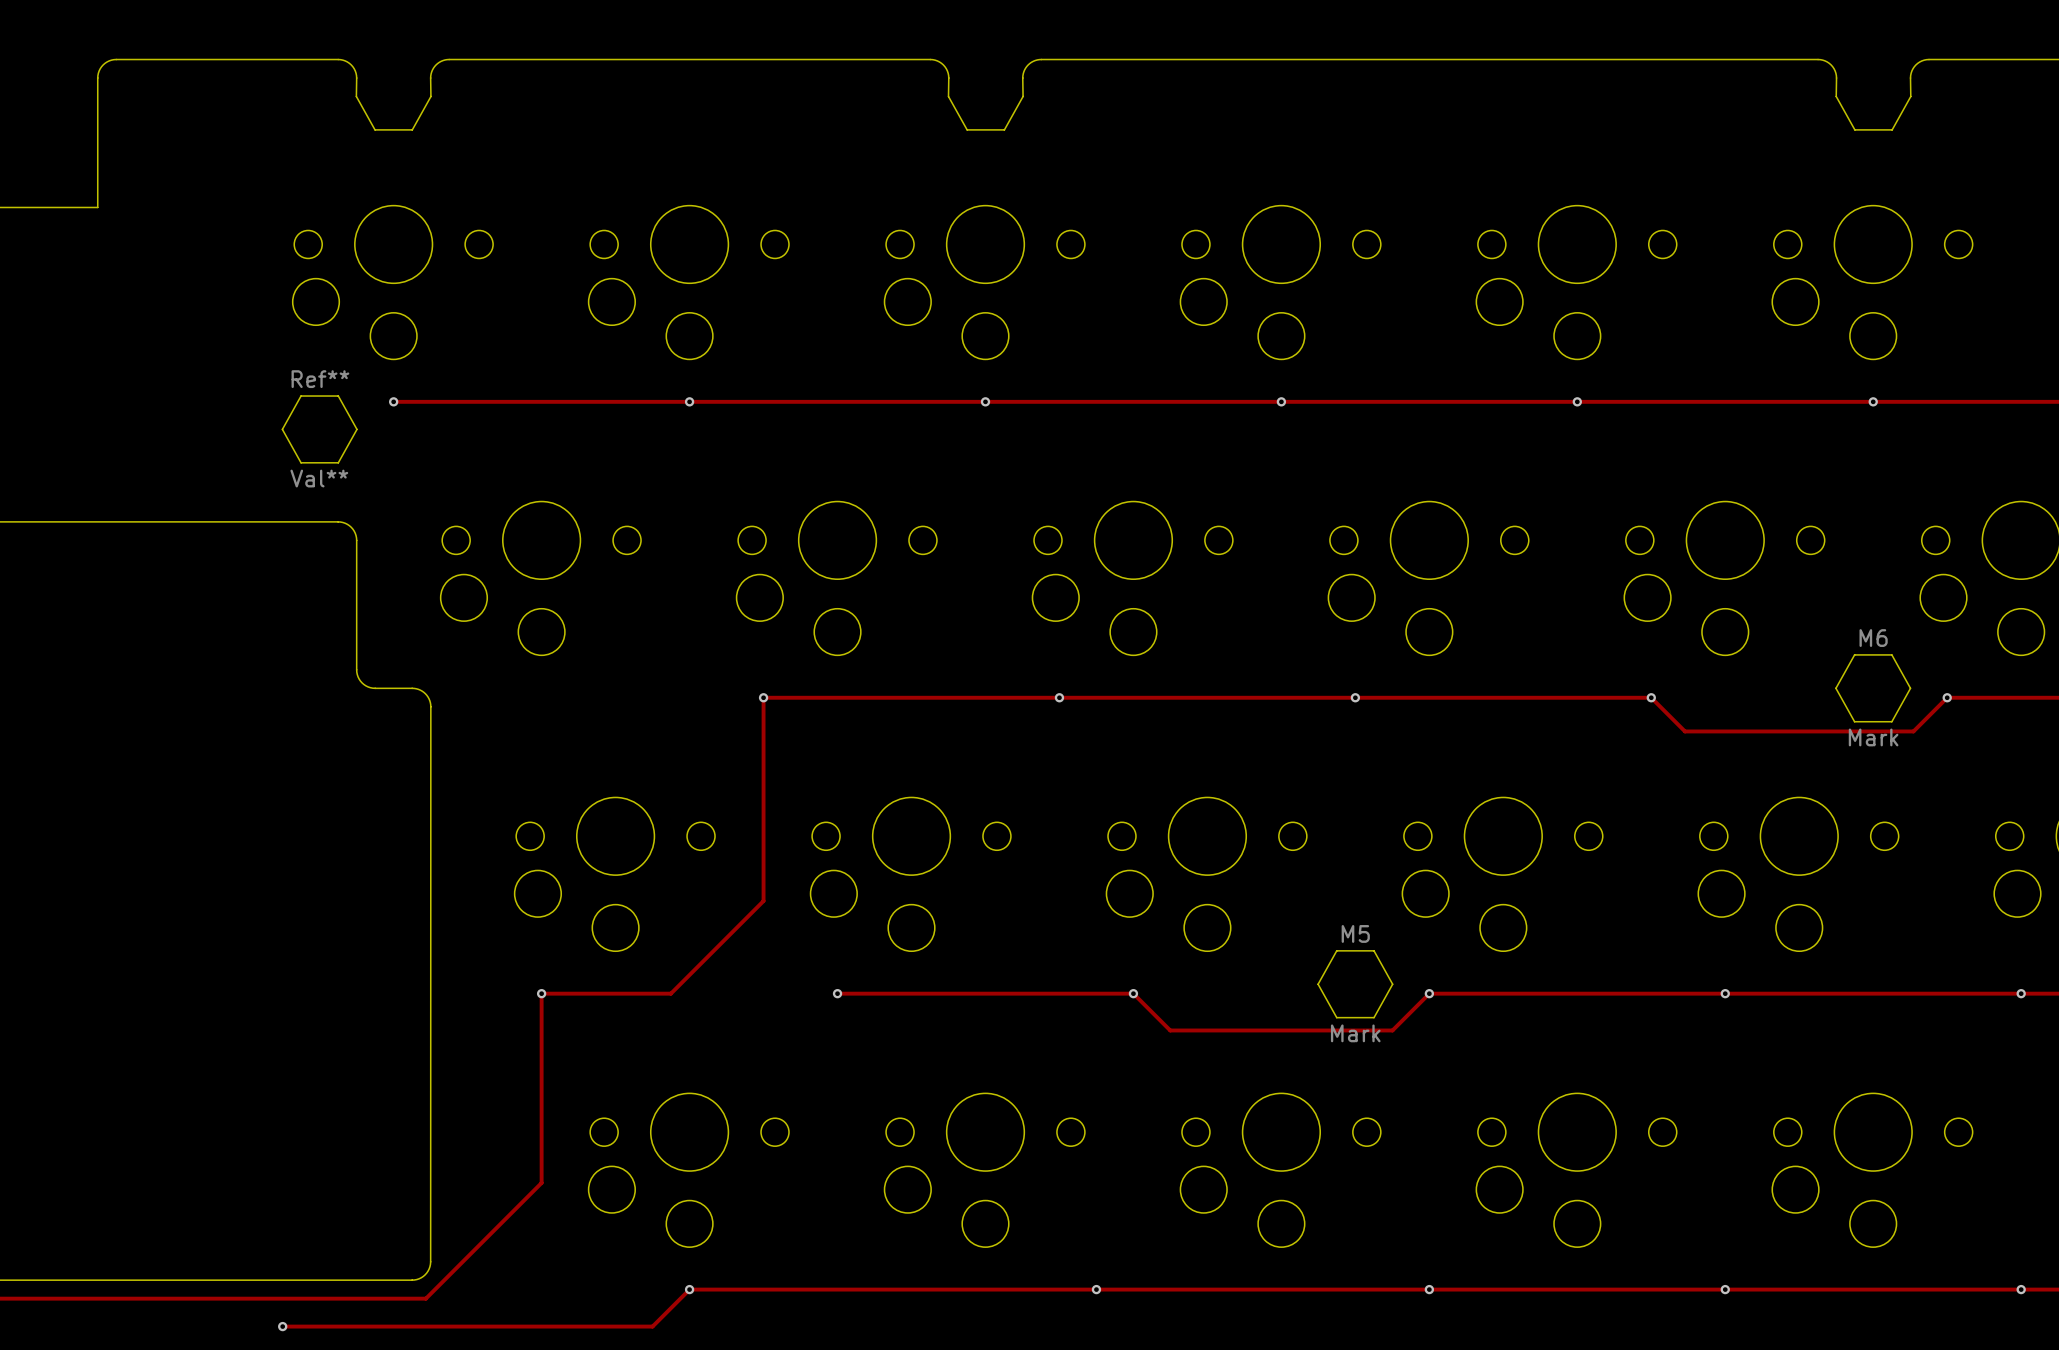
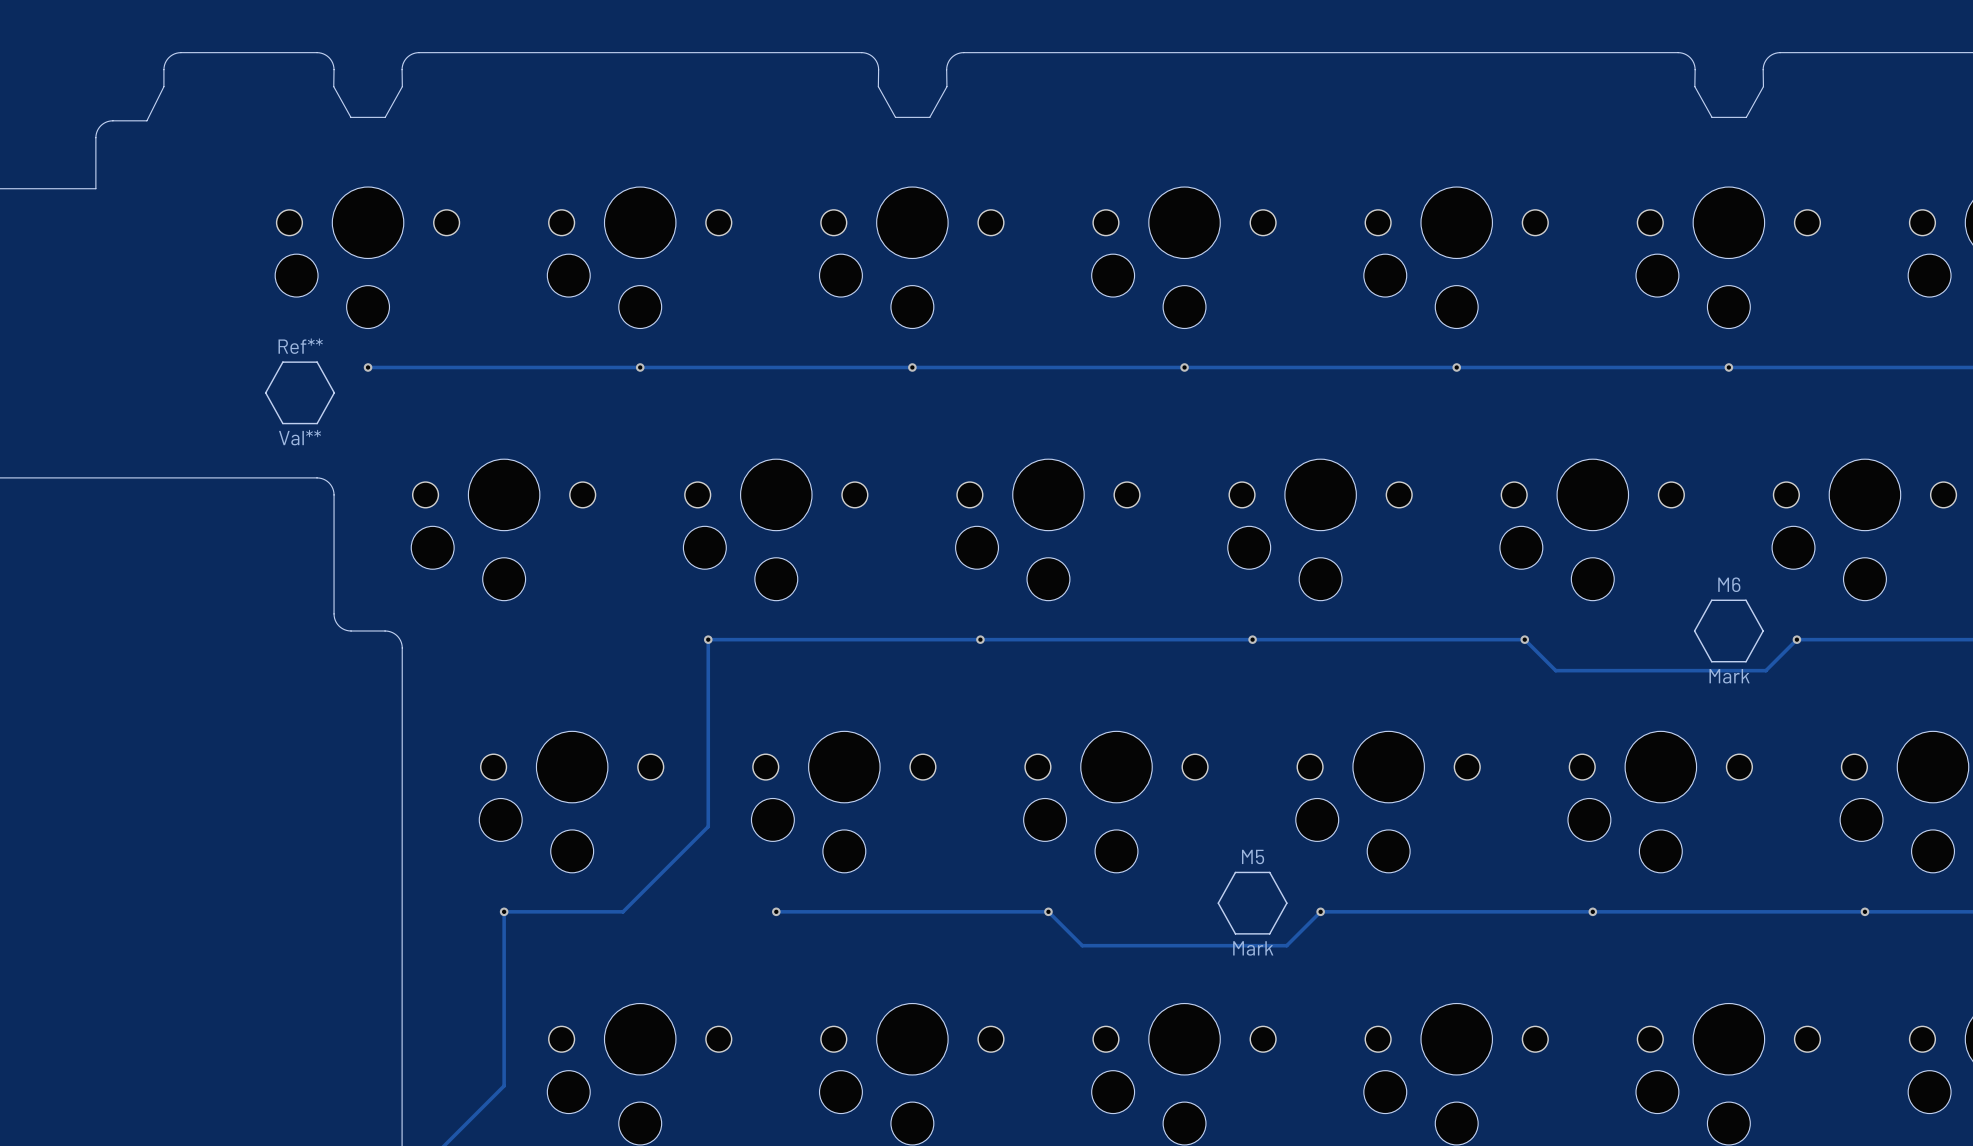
board edge: (190, 59) (116, 59) (103, 64) (97, 78) (97, 151) -> (180, 52) (172, 54) (166, 61) (164, 67) (163, 86) (146, 120) (107, 121) (98, 128) (95, 137)

